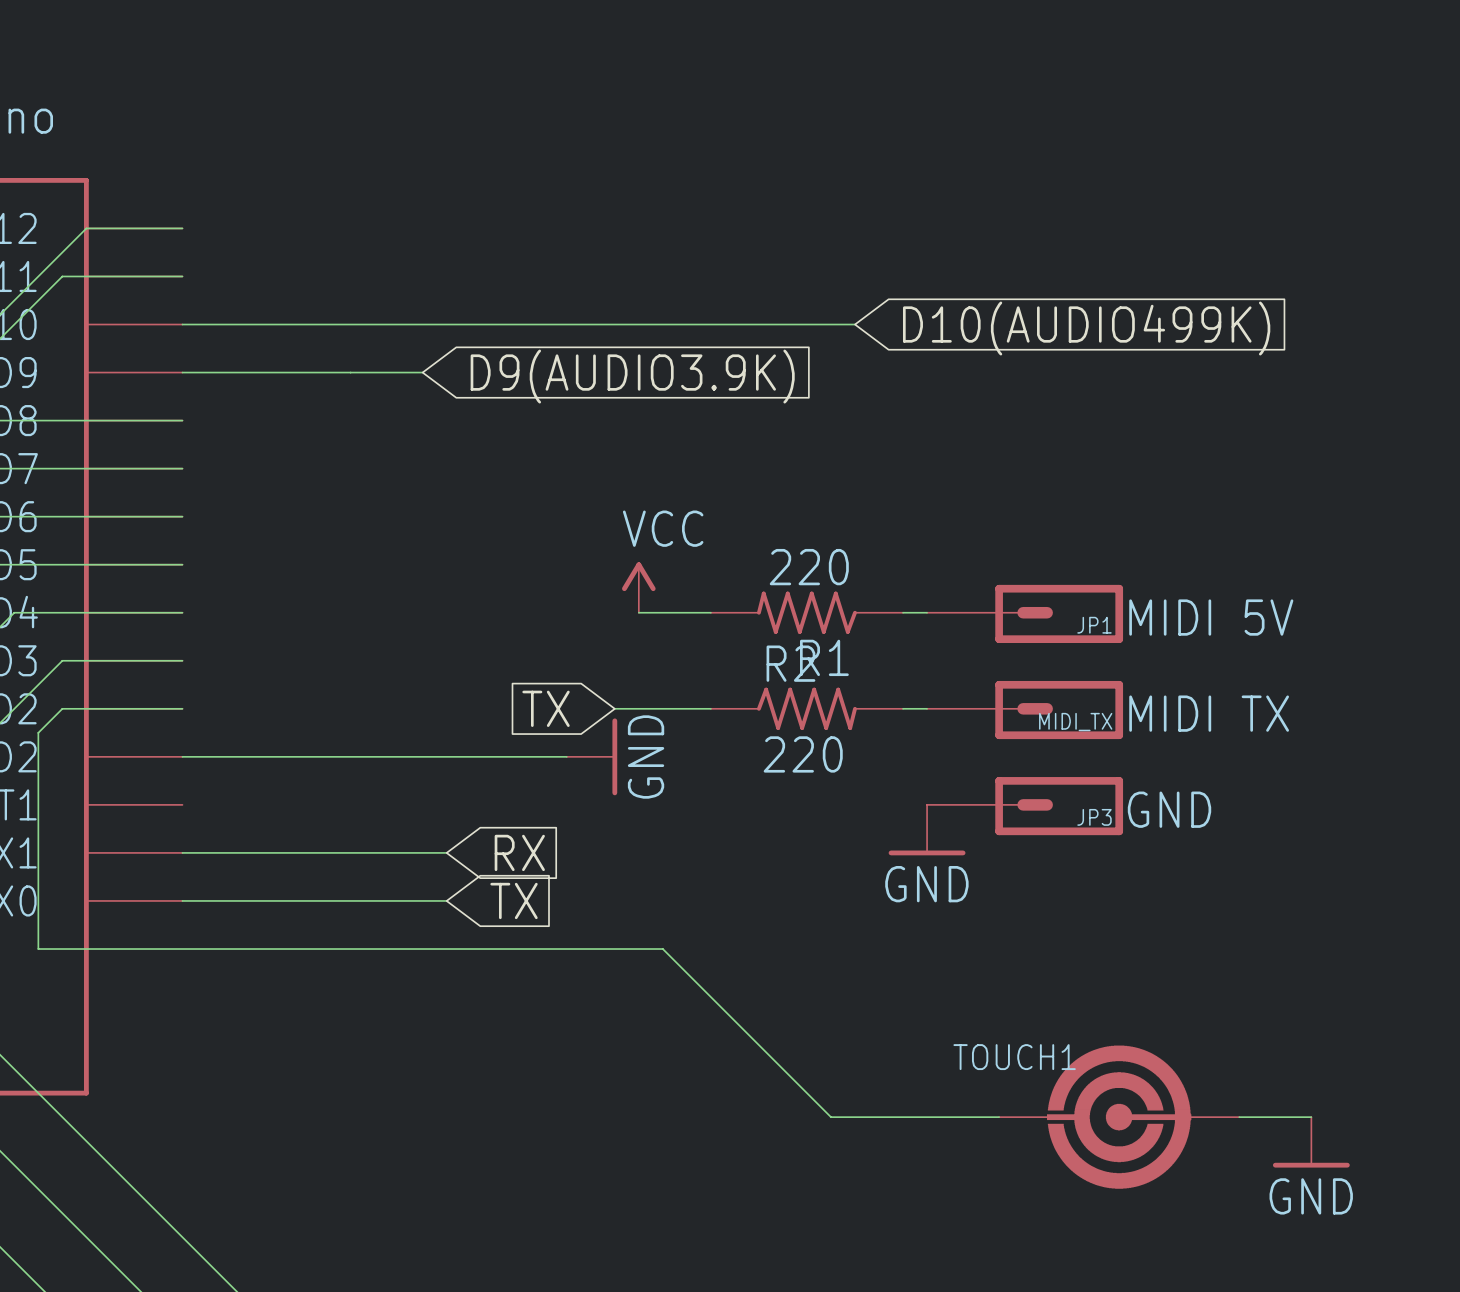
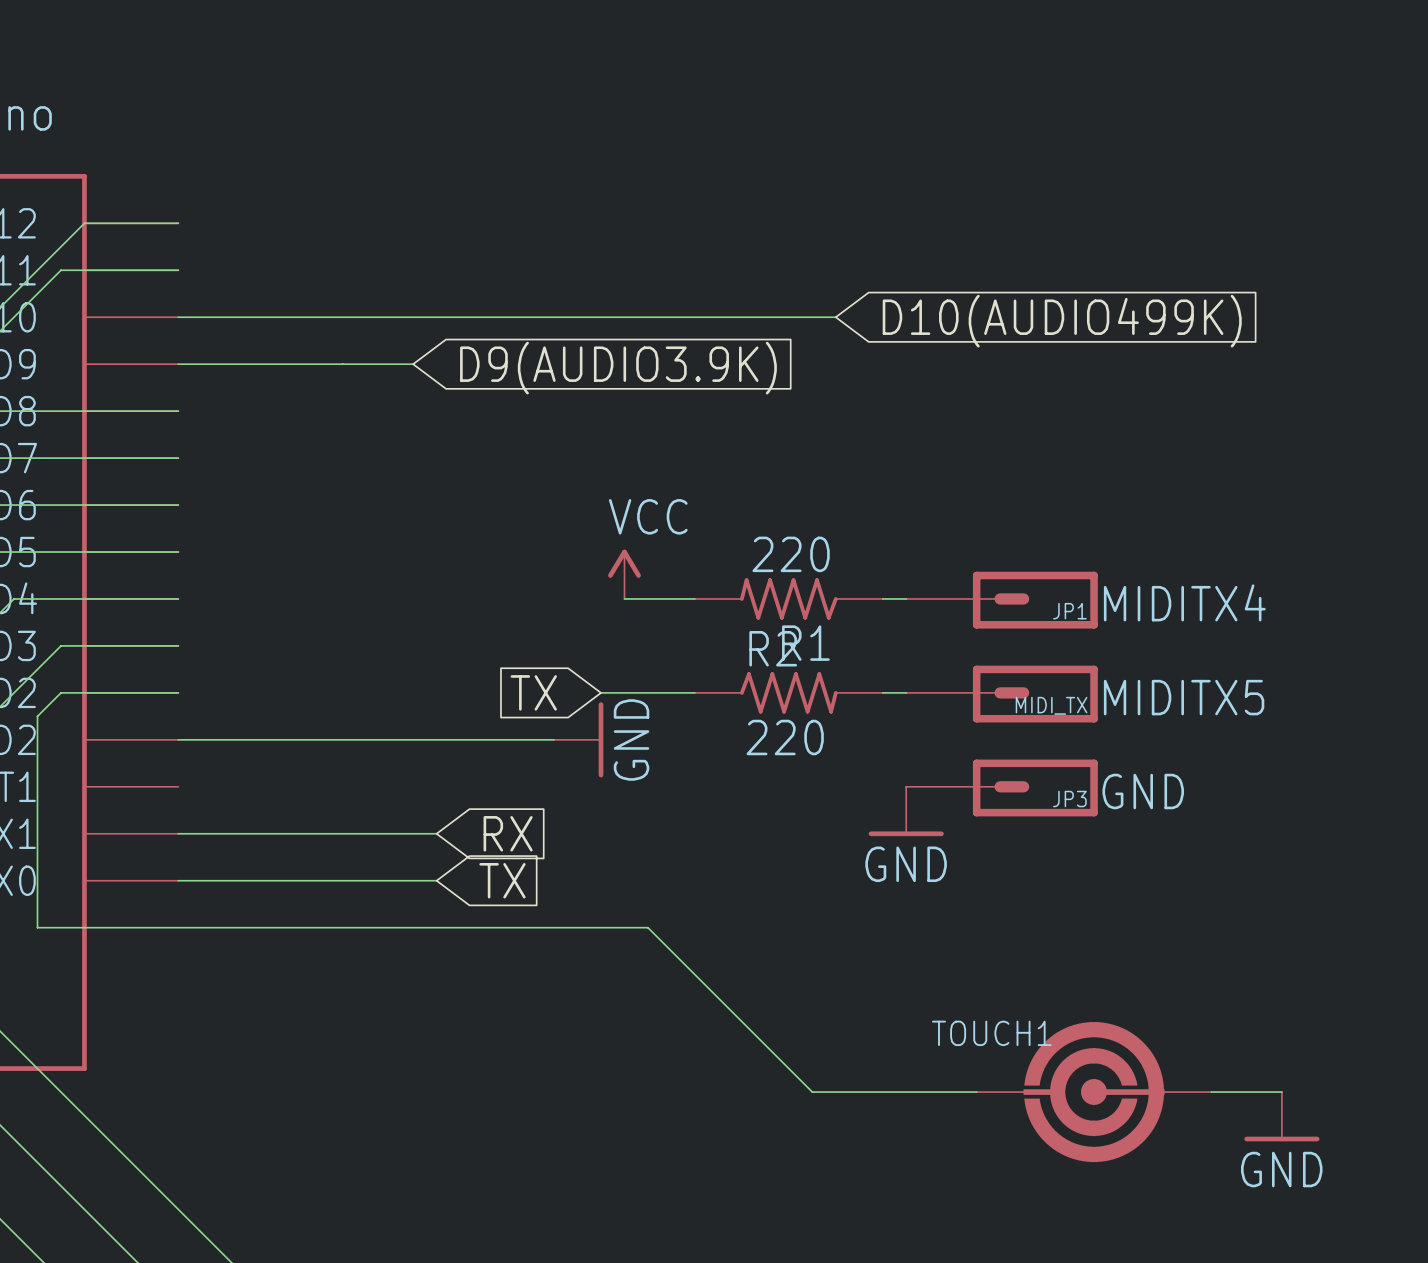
JP1 value: MIDI 5V (1211, 617) -> MIDITX4 (1184, 602)
MIDI_TX value: MIDI TX (1209, 713) -> MIDITX5 (1184, 697)

